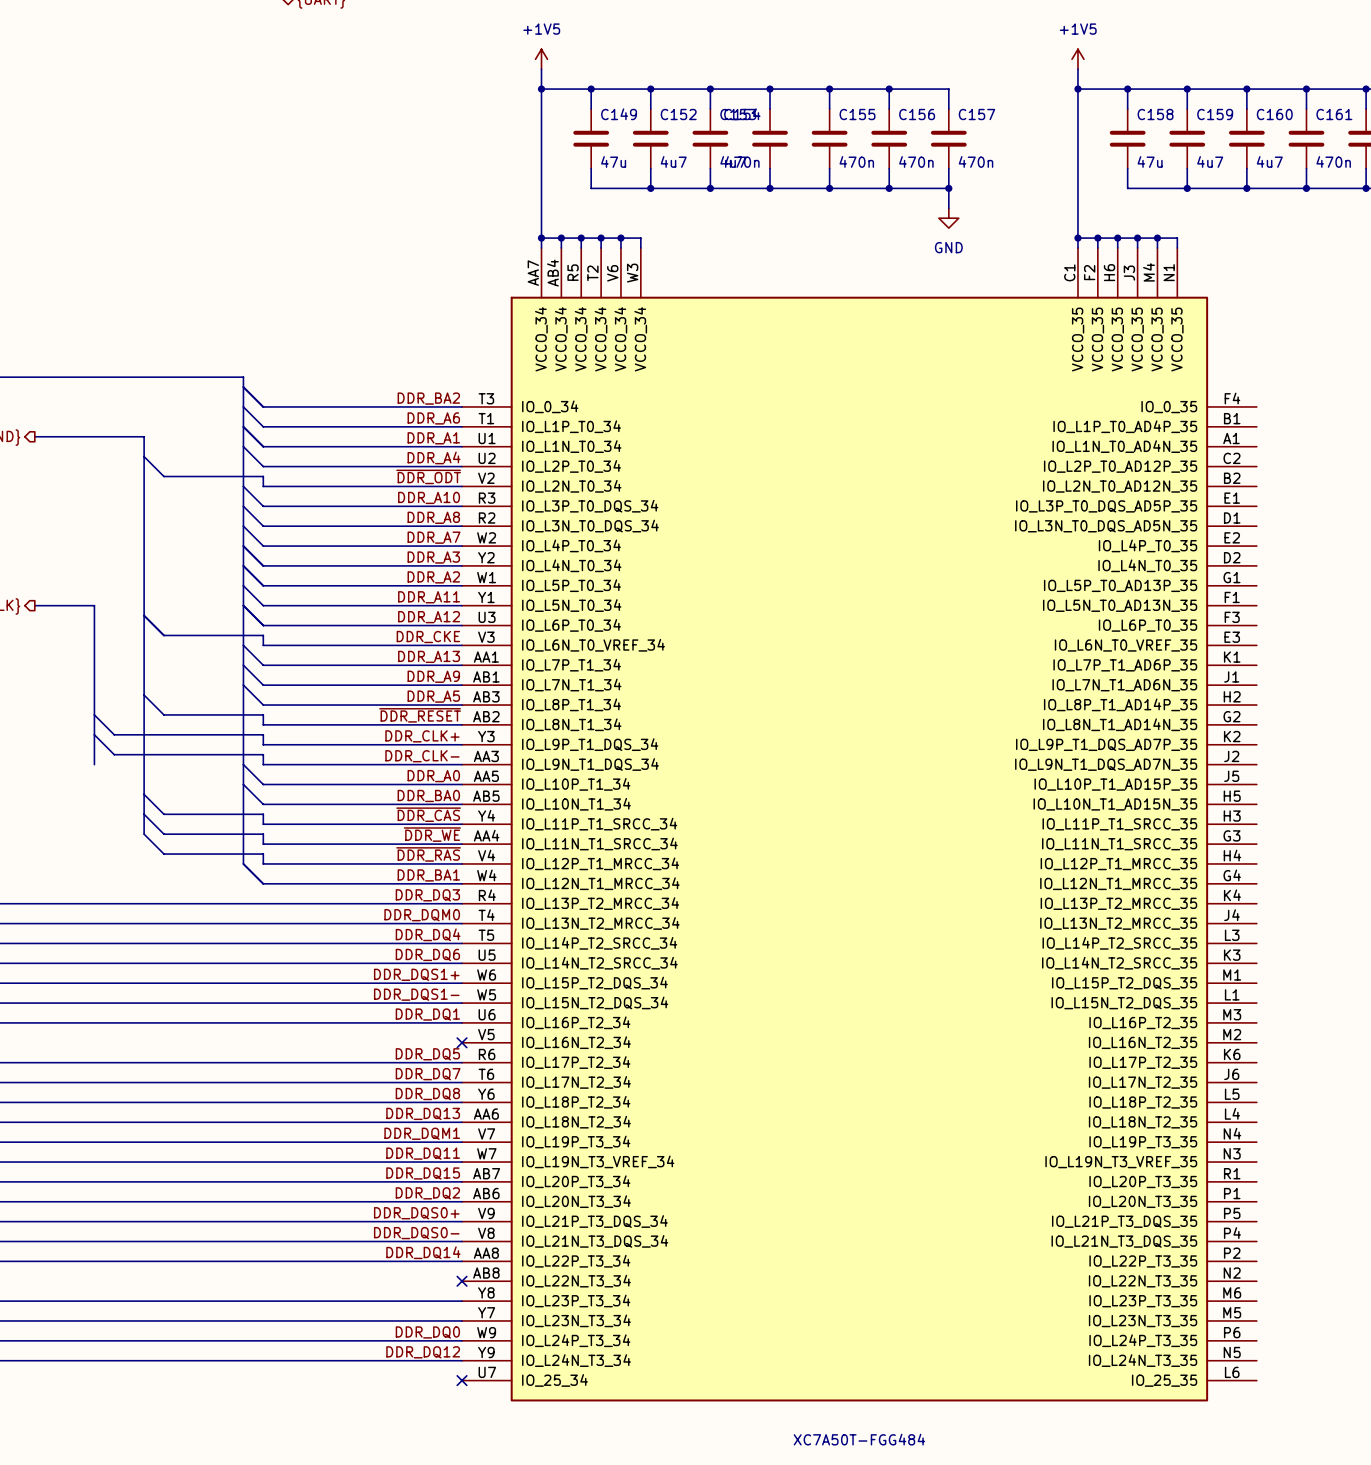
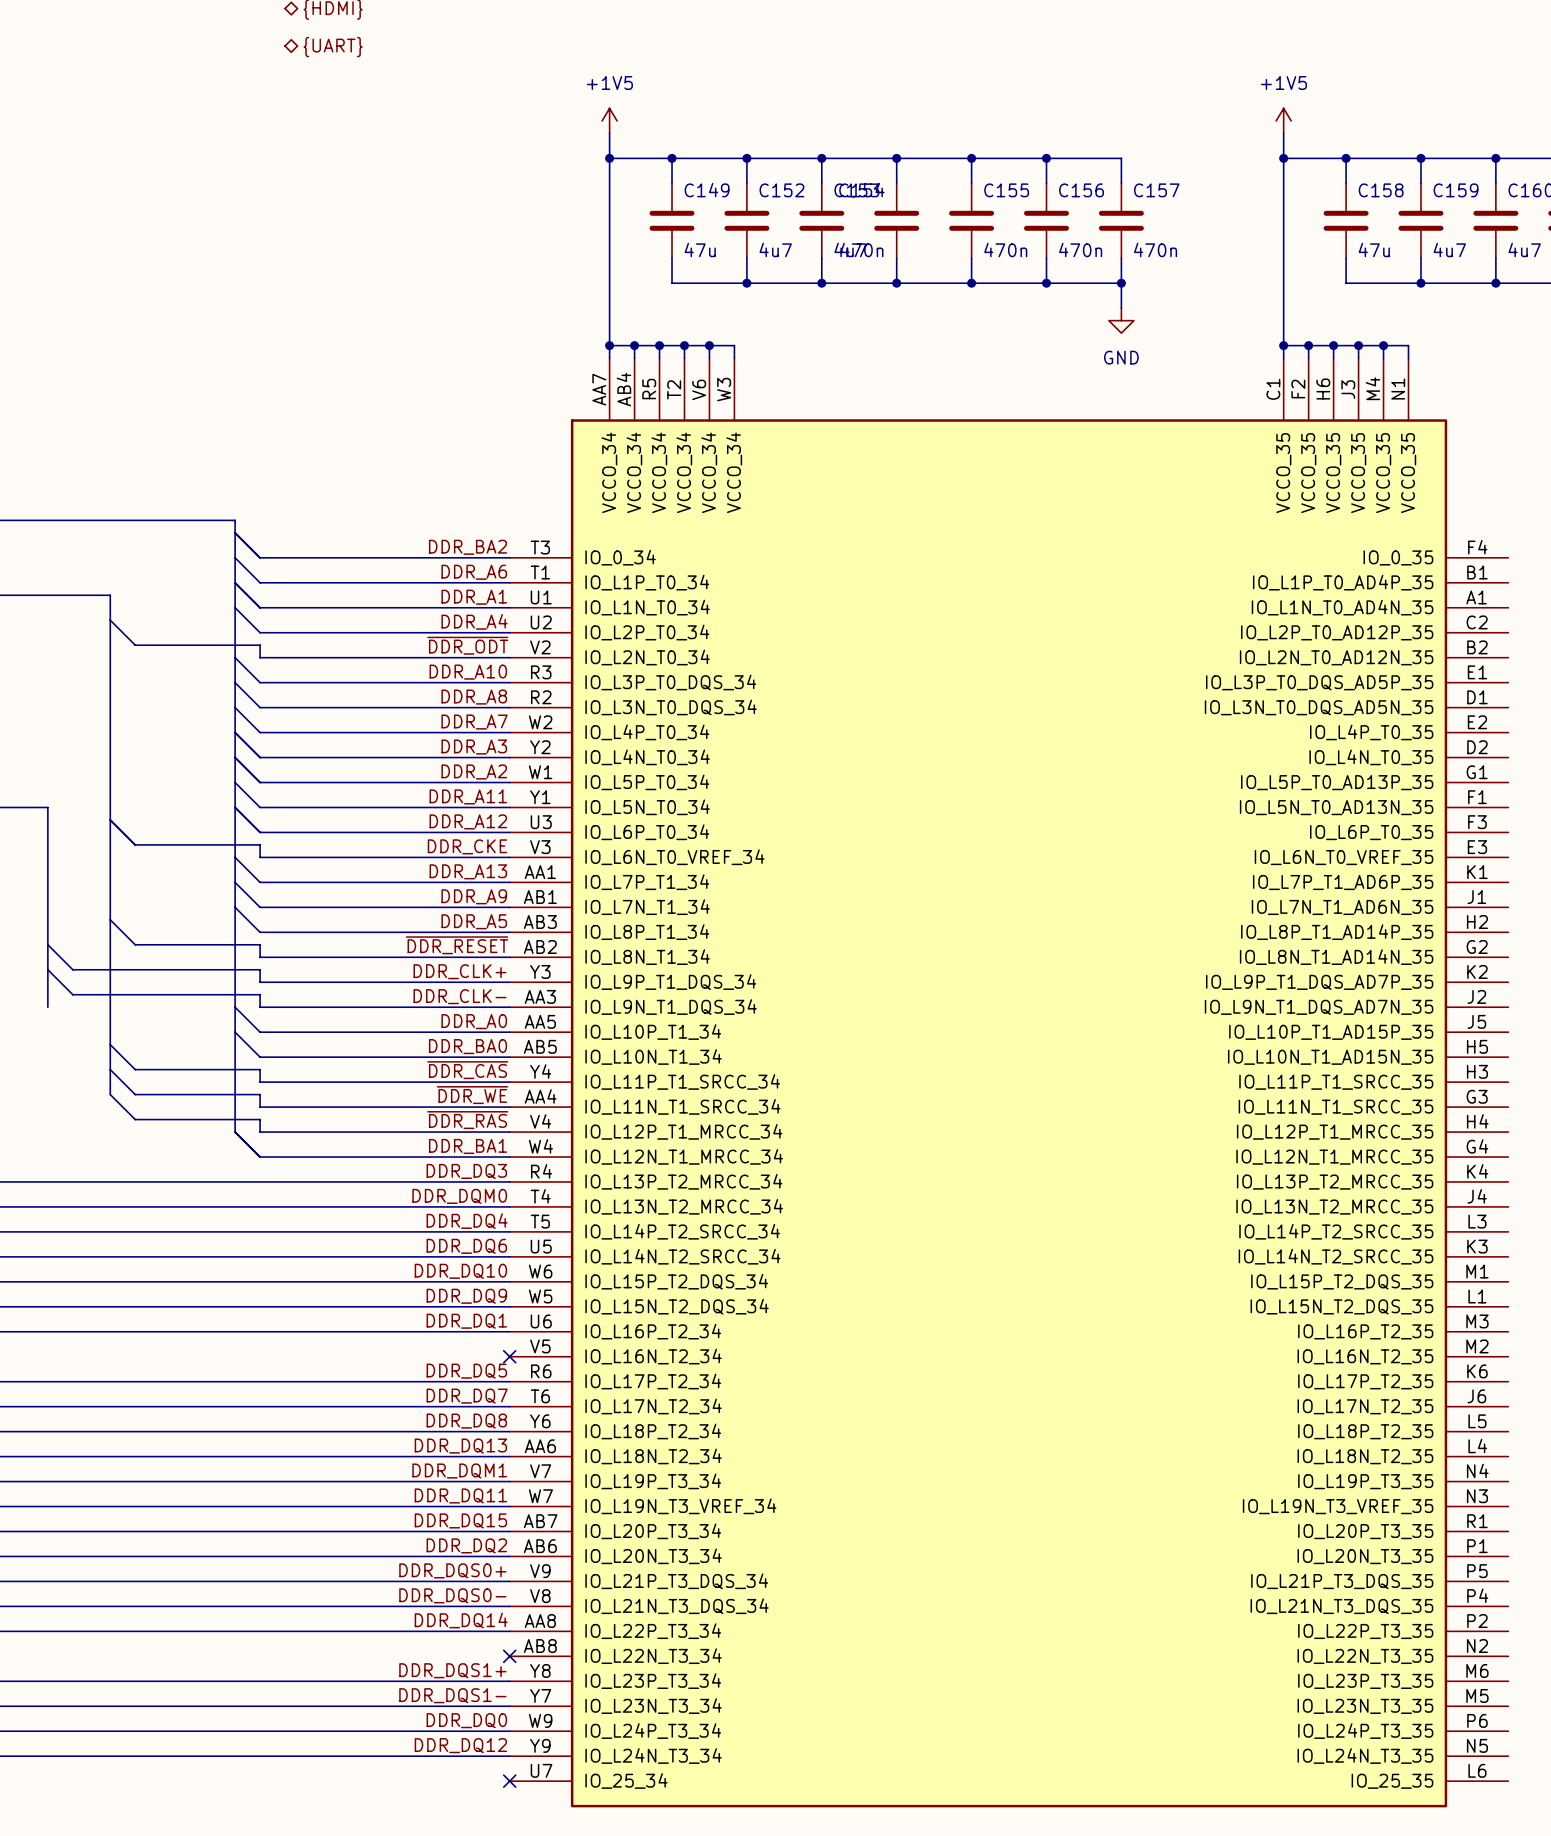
label: DDR_DQS1+ (416, 974) -> DDR_DQ10 (460, 1271)
label: DDR_DQS1- (416, 994) -> DDR_DQ9 (466, 1296)
label: none -> DDR_DQS1+ (452, 1670)
label: none -> DDR_DQS1- (452, 1695)

